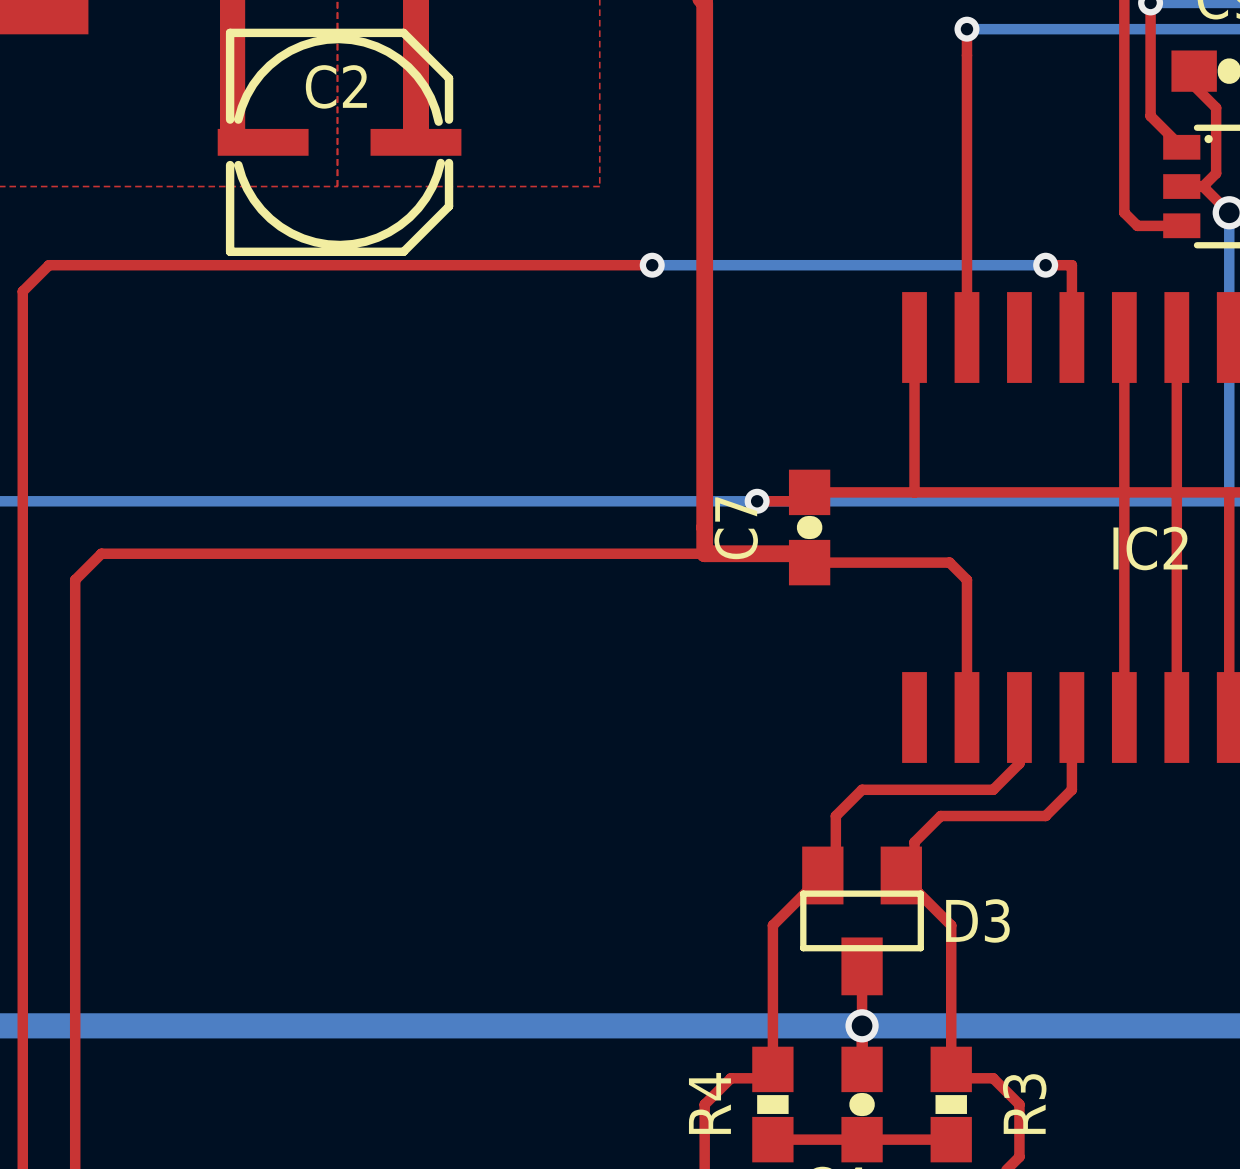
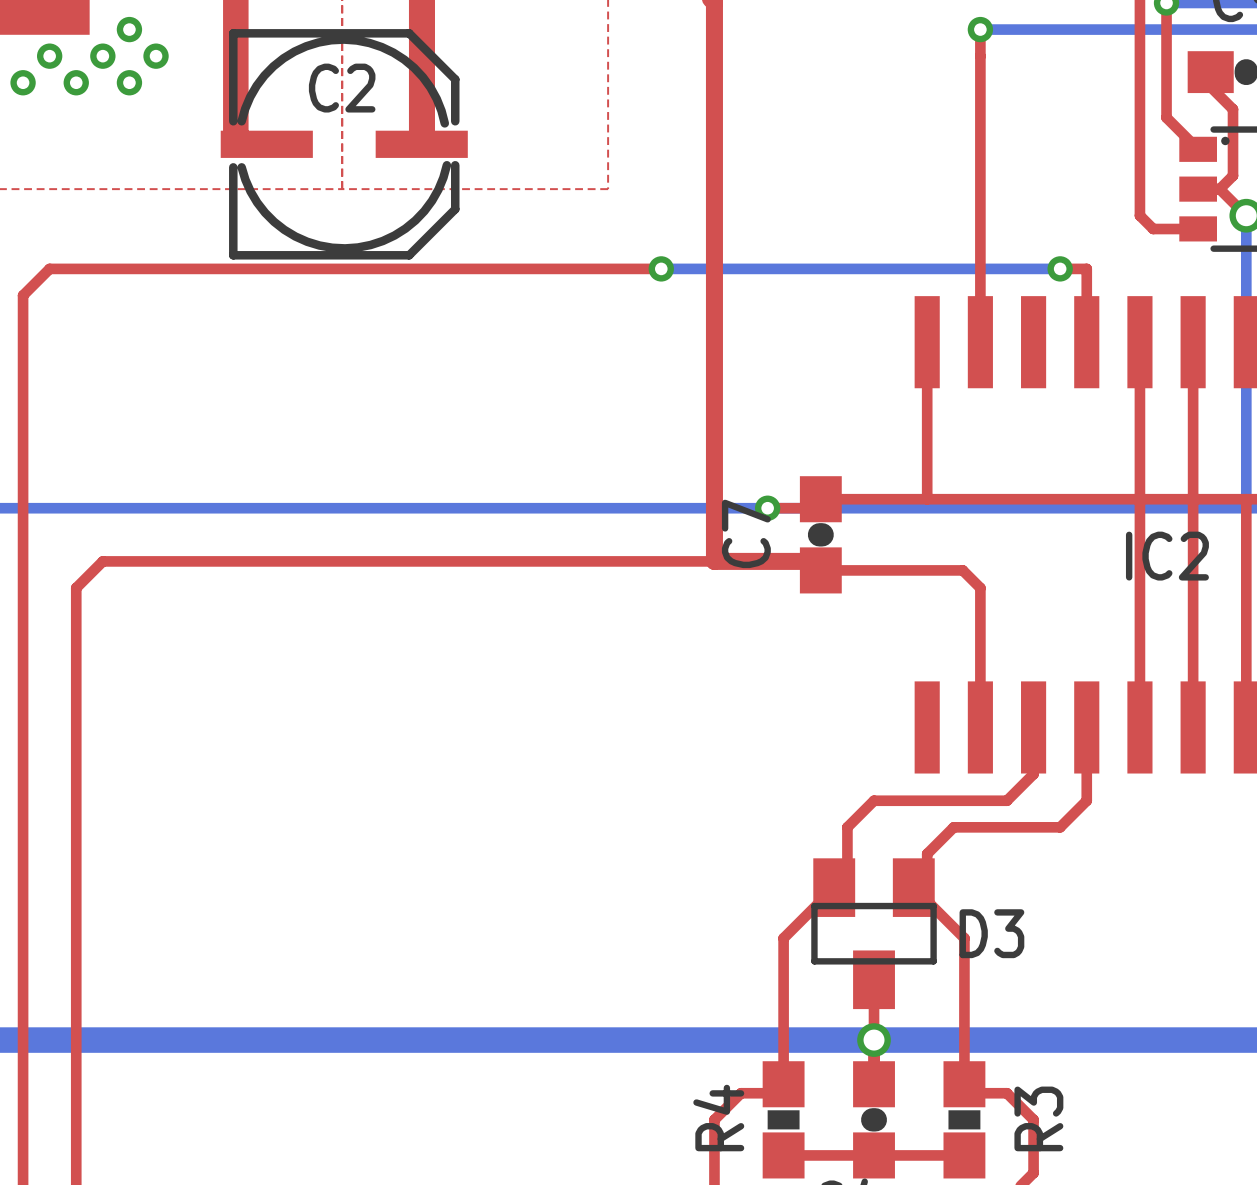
via: none -> (129, 29)
via: none -> (49, 56)
via: none -> (102, 56)
via: none -> (156, 56)
via: none -> (23, 82)
via: none -> (76, 82)
via: none -> (129, 82)

